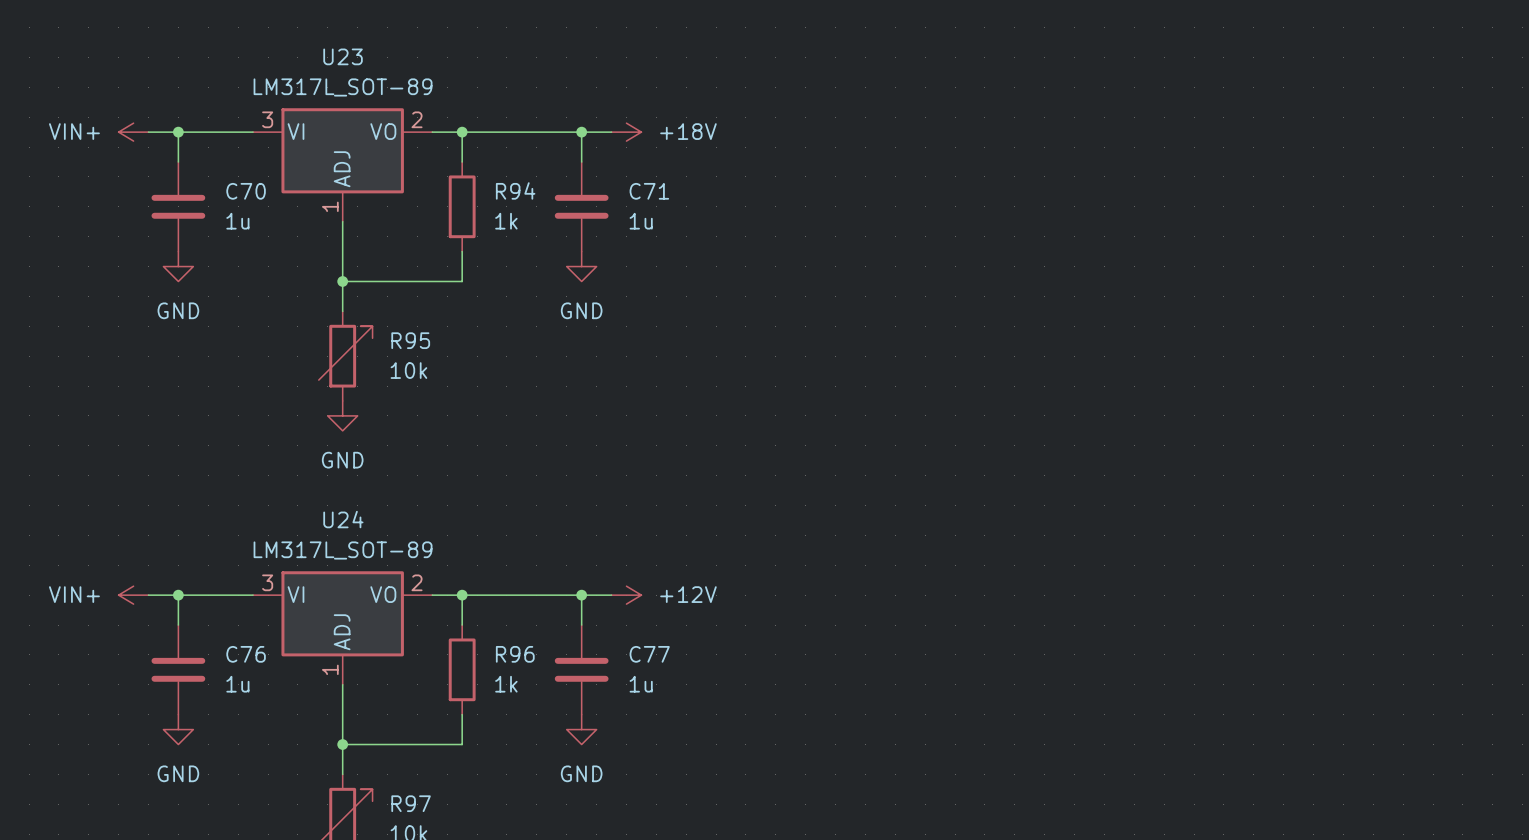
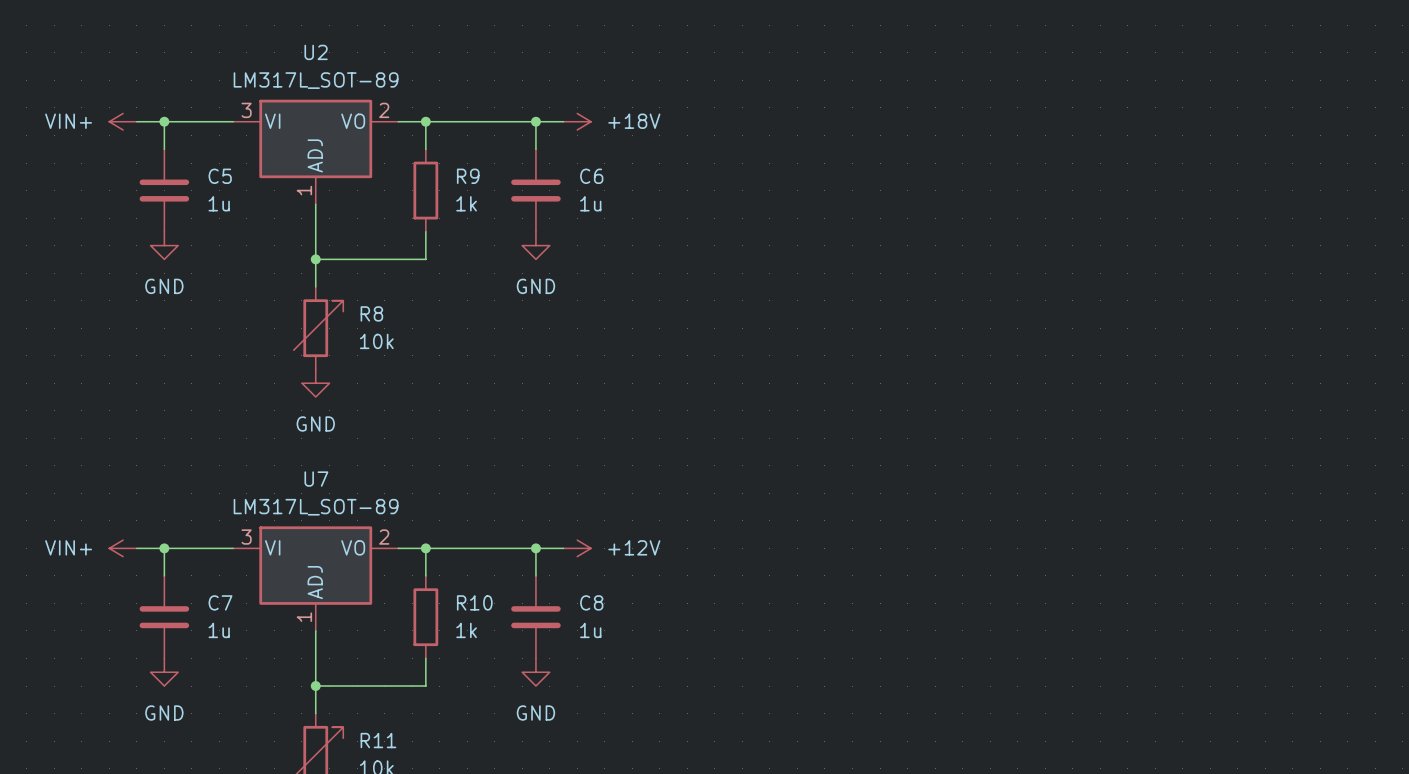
U23 name: U23 (343, 56) -> U2 (316, 52)
R94 name: R94 (515, 190) -> R9 (468, 176)
C70 name: C70 (246, 191) -> C5 (220, 176)
C71 name: C71 (649, 191) -> C6 (591, 176)
R95 name: R95 (410, 340) -> R8 (371, 313)
U24 name: U24 (343, 519) -> U7 (316, 479)
C76 name: C76 (246, 654) -> C7 (220, 602)
R96 name: R96 (515, 654) -> R10 (474, 602)
C77 name: C77 (649, 654) -> C8 (591, 602)
R97 name: R97 (411, 803) -> R11 (378, 740)

